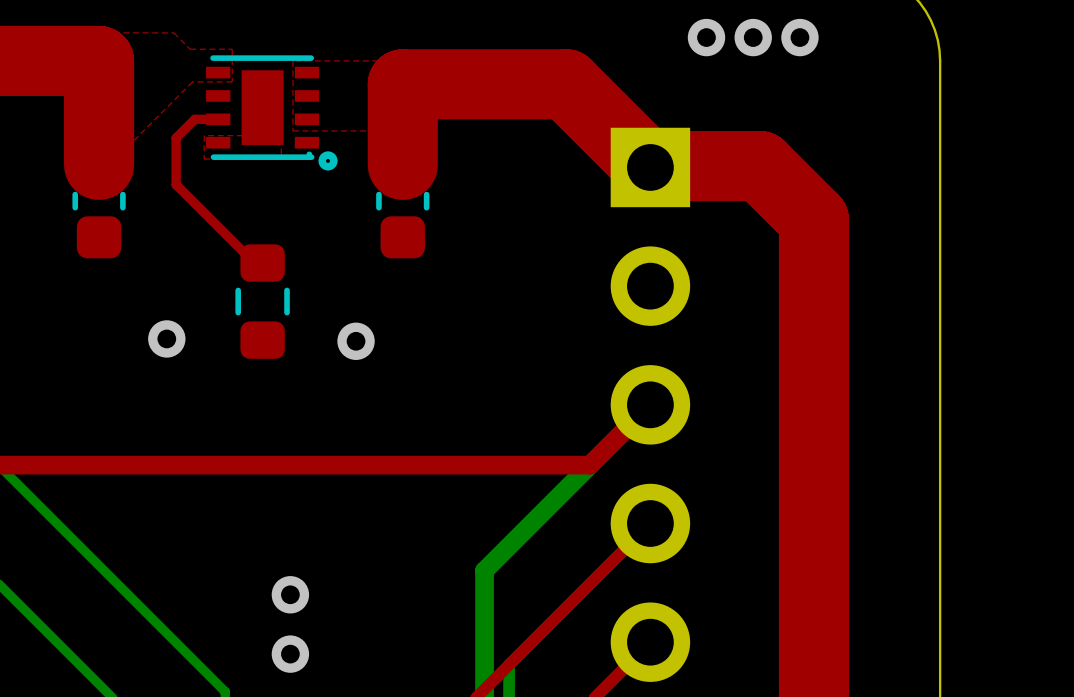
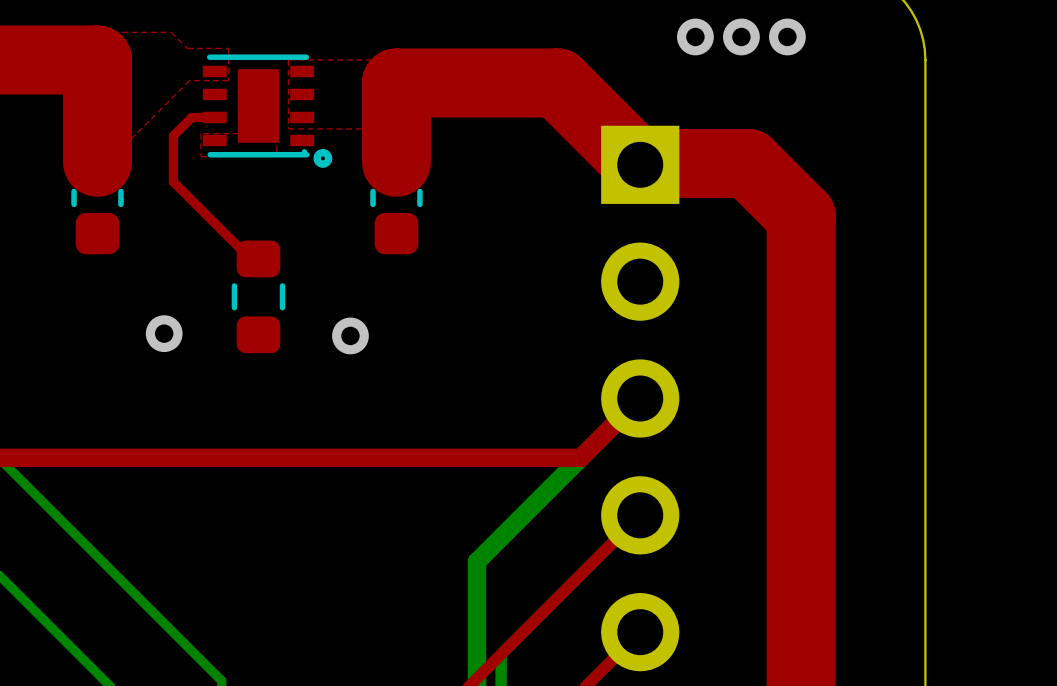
via: (290, 594) -> none
via: (290, 654) -> none

